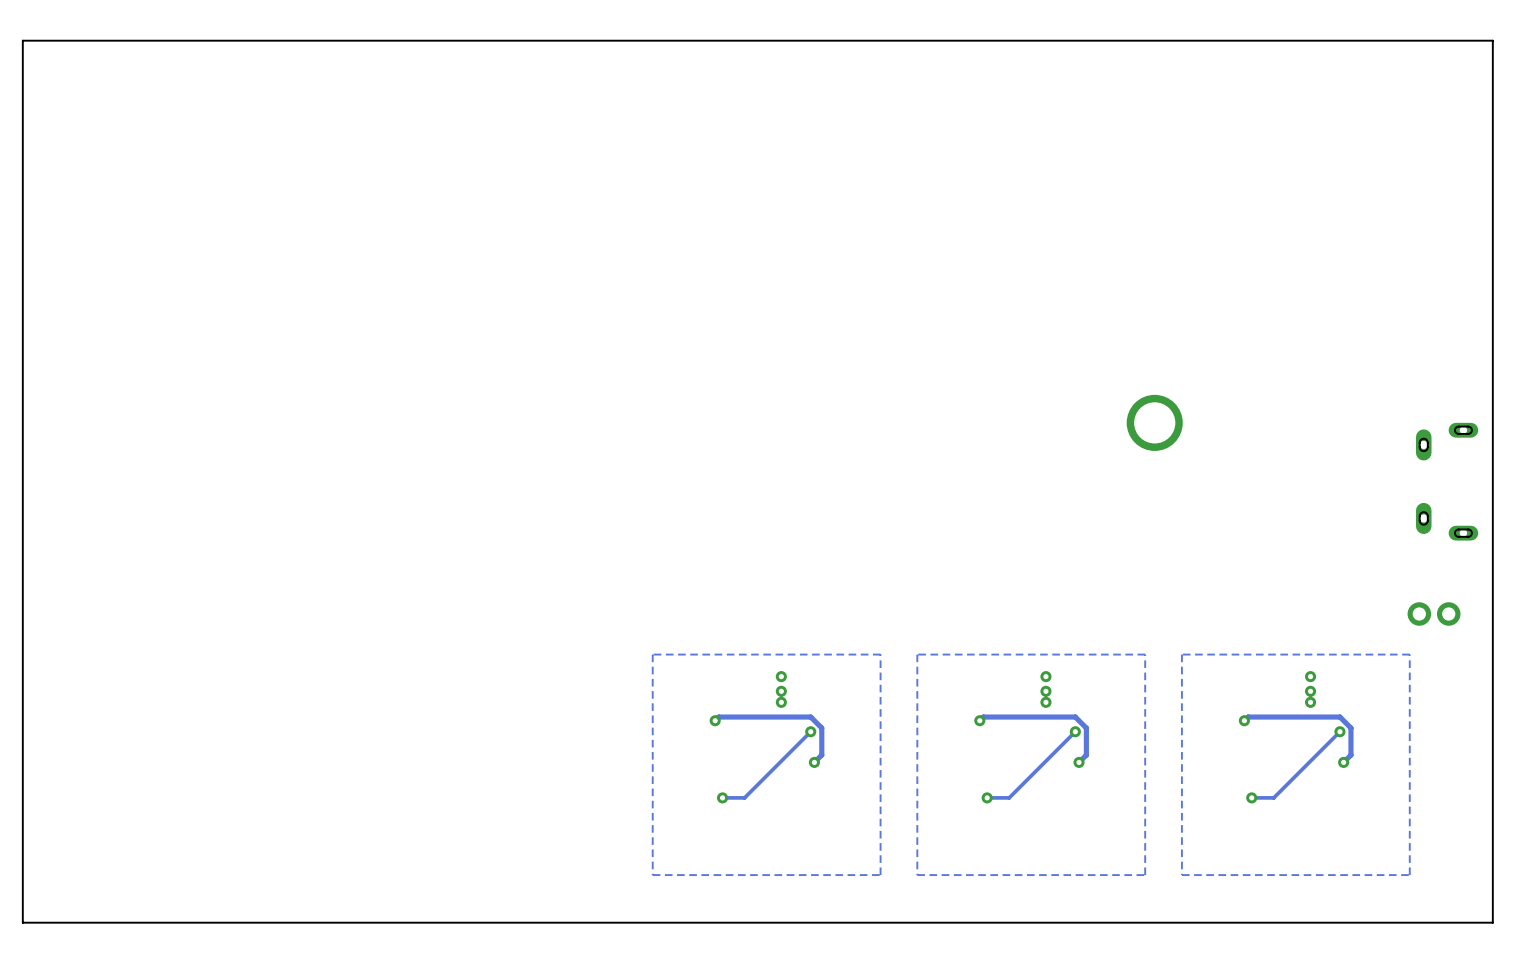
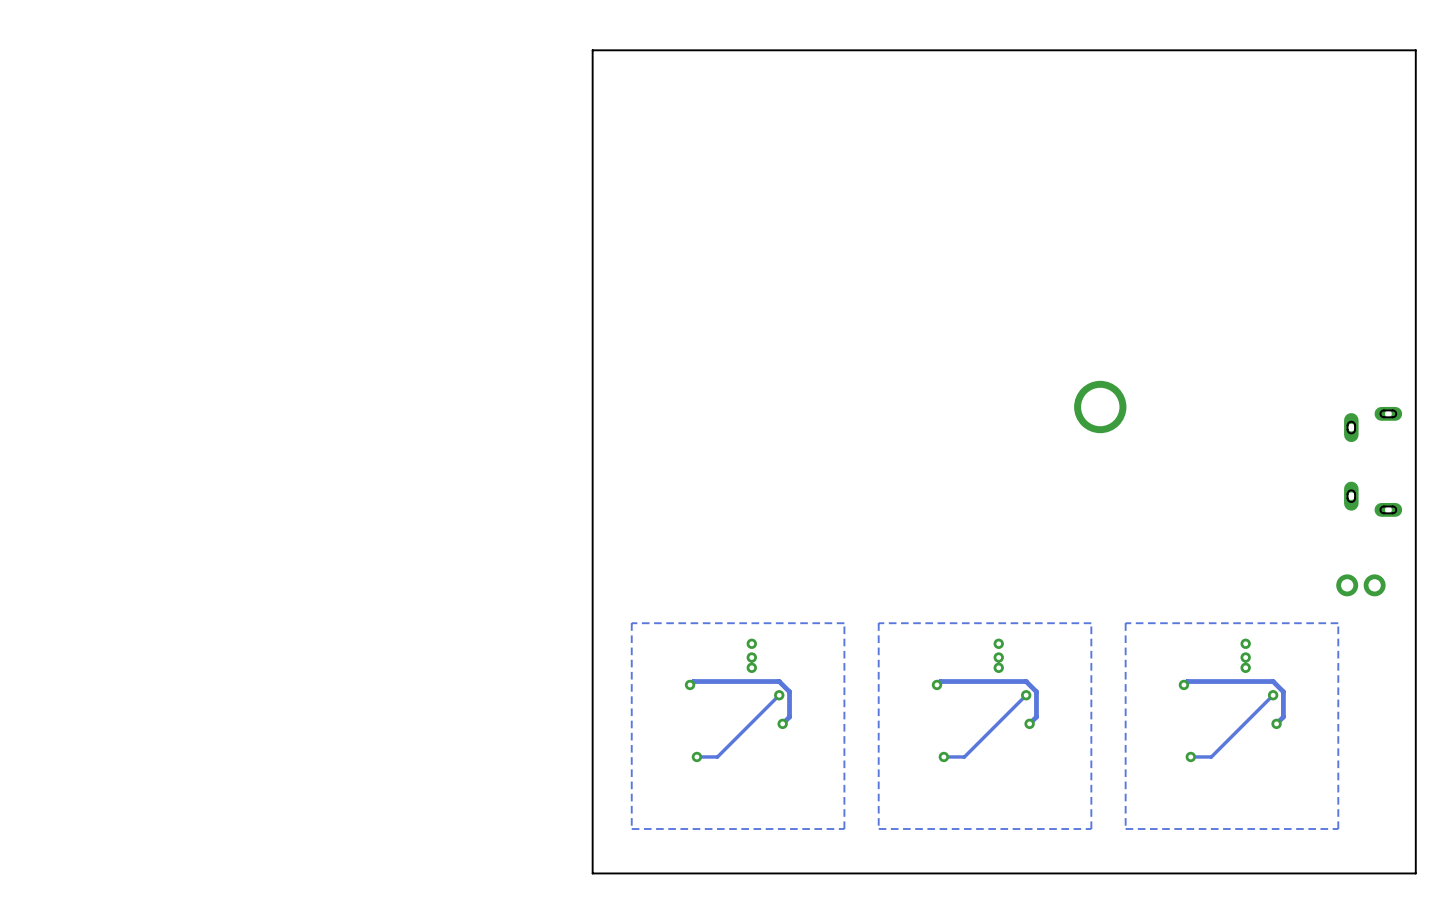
board edge: (610, 40) (22, 40) (22, 922) (610, 922) -> (592, 50) (592, 873)

